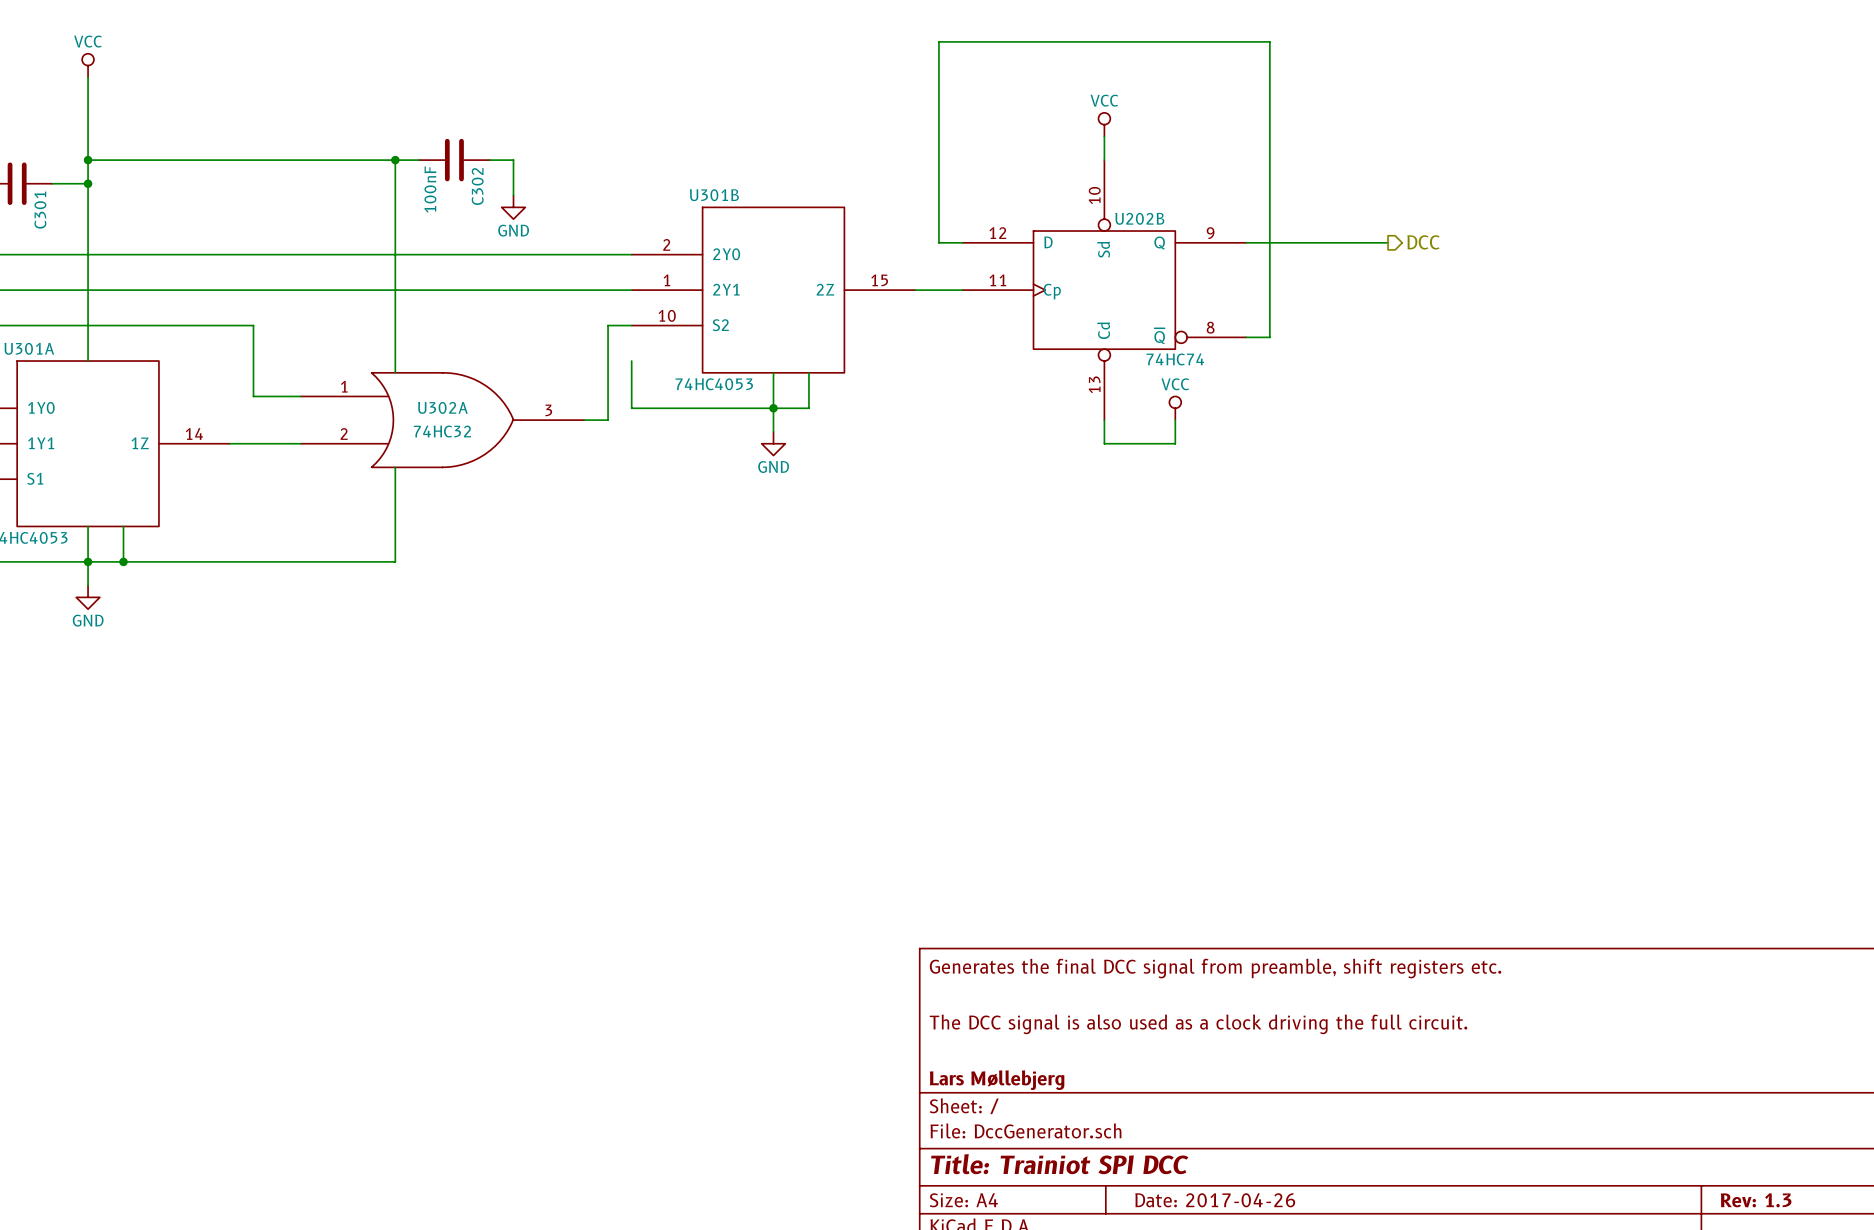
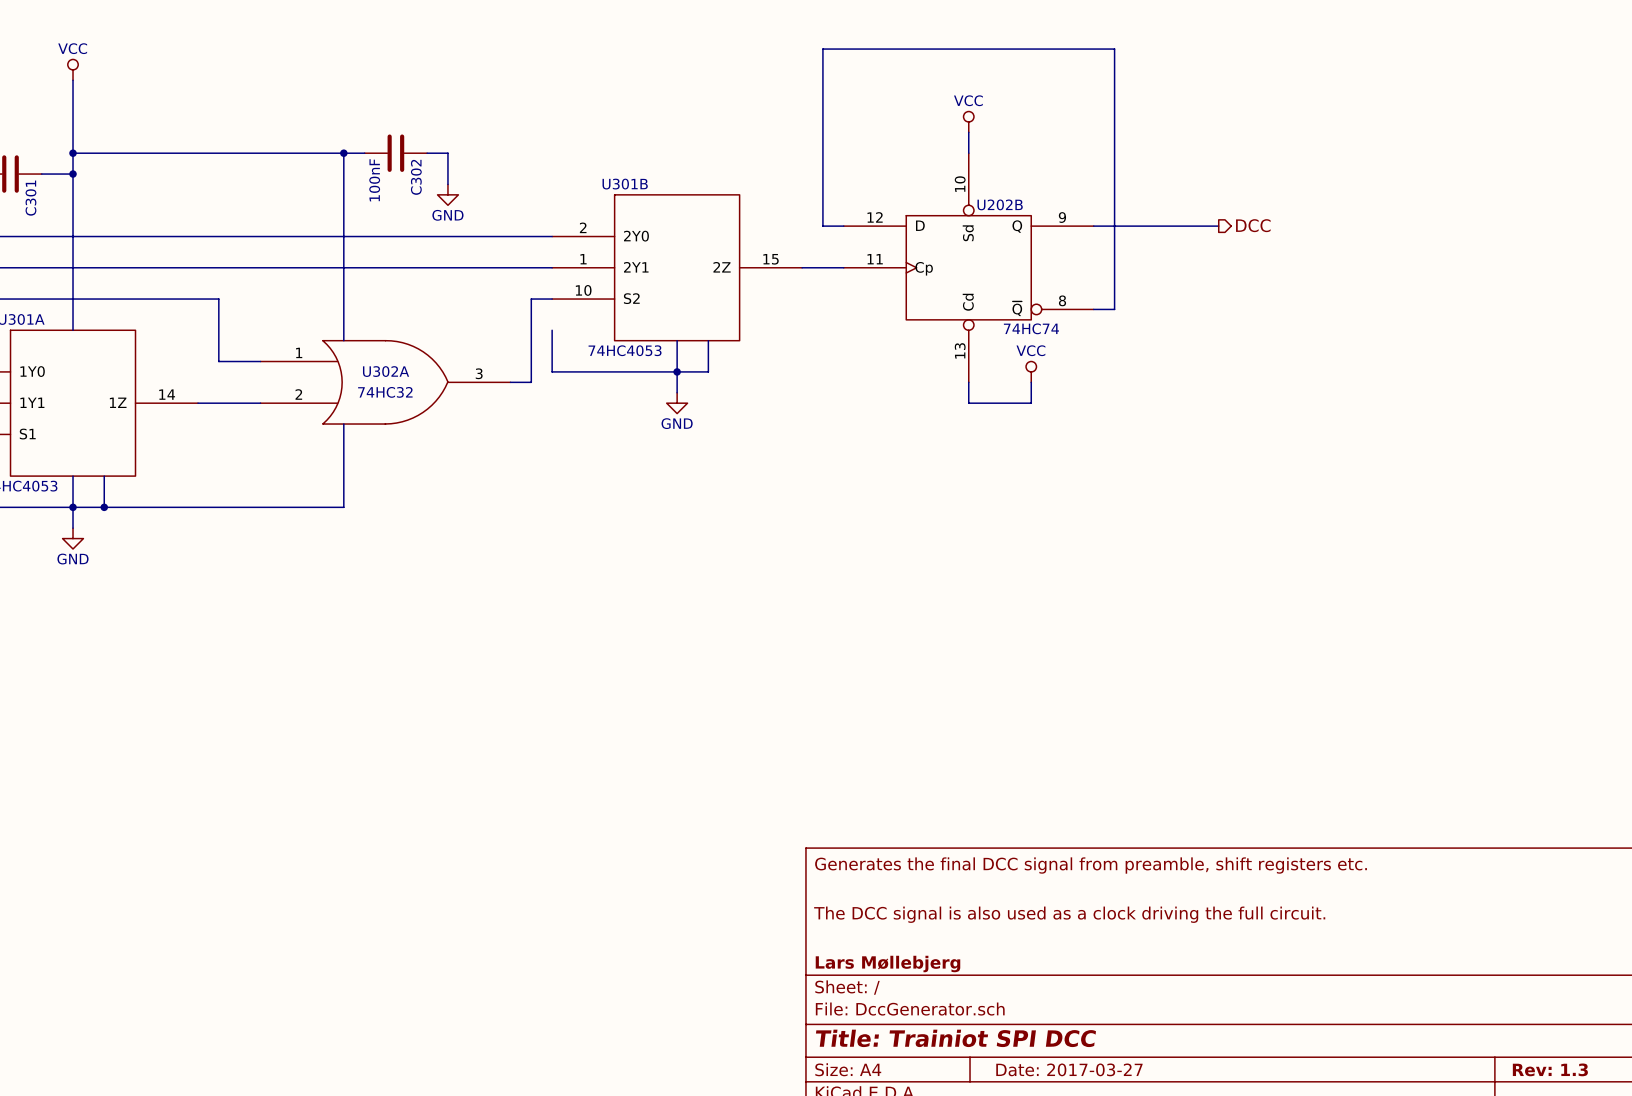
title block: Date: 2017-04-26 (1215, 1200) -> Date: 2017-03-27 (1069, 1069)

